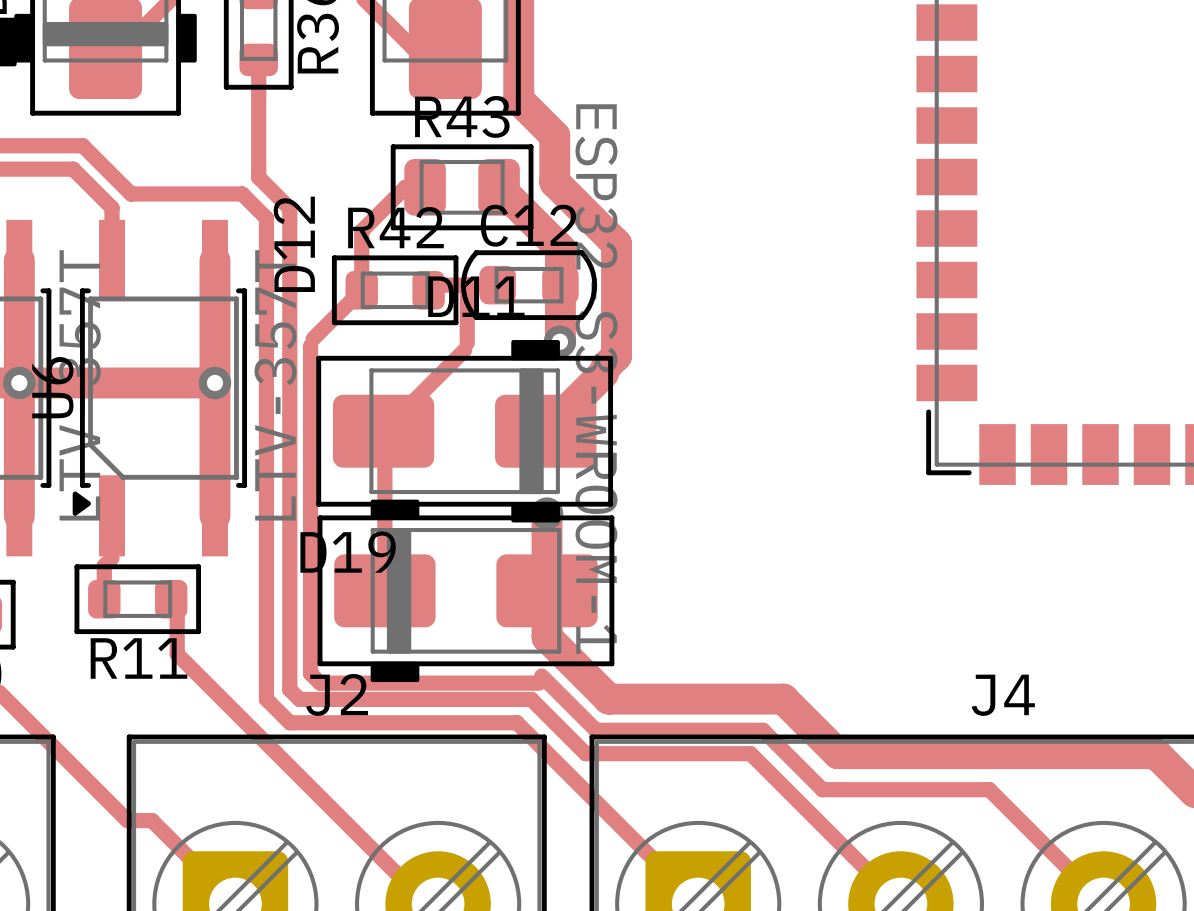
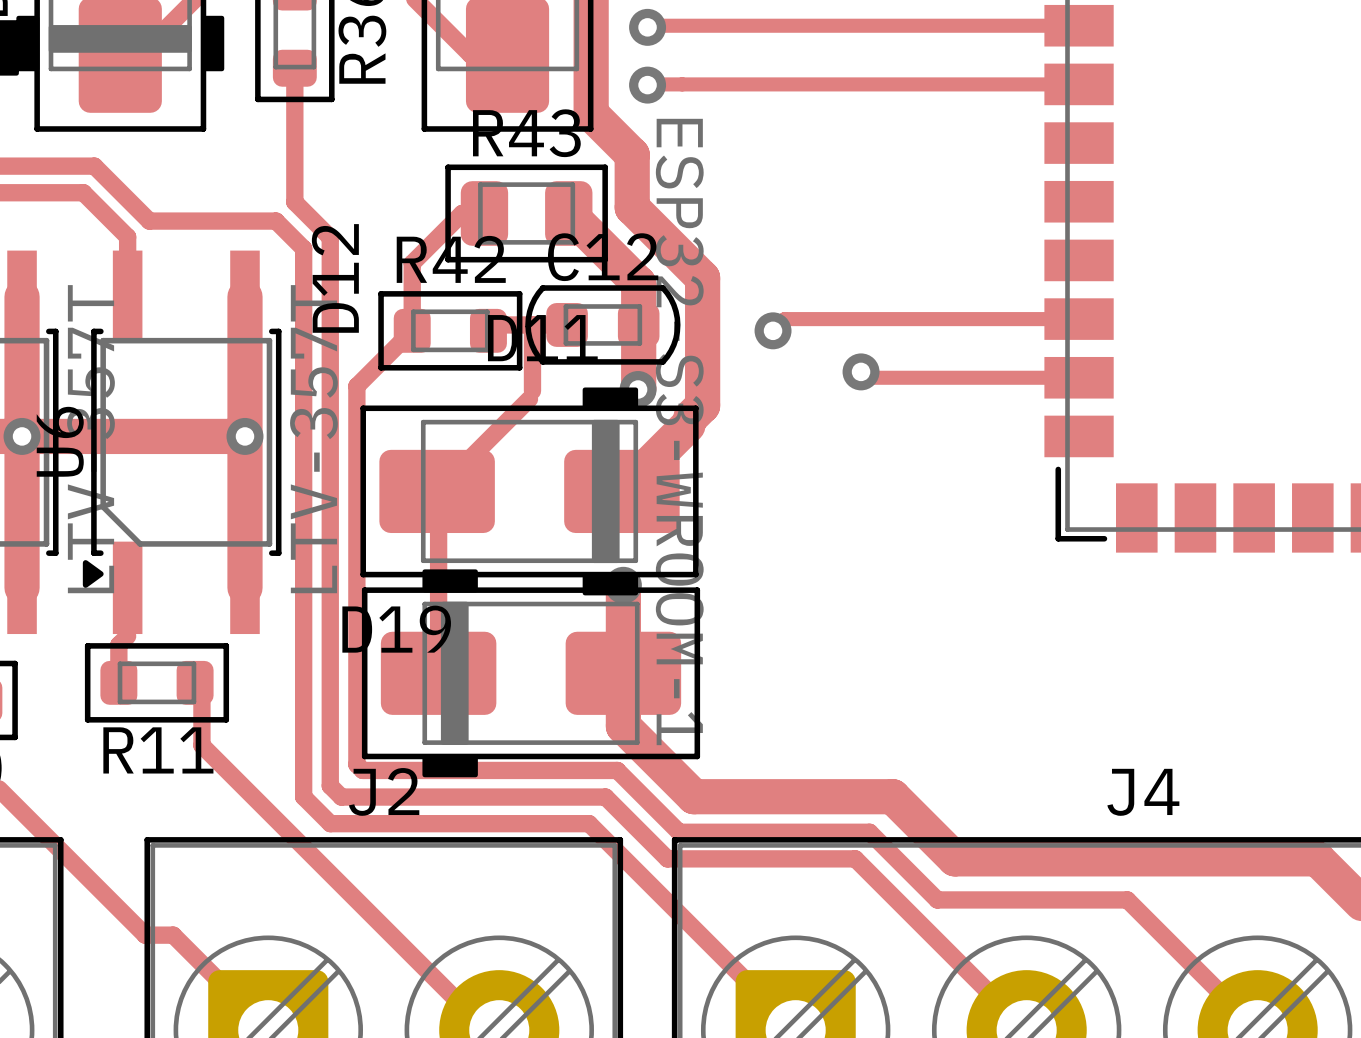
track: none -> (1079, 25) (649, 25) (647, 27)
via: none -> (647, 27)
via: none -> (647, 85)
track: none -> (1079, 84) (647, 85)
track: none -> (1079, 319) (784, 319) (773, 330)
via: none -> (773, 330)
track: none -> (861, 371) (866, 377) (1079, 377)
via: none -> (861, 371)
track: none -> (356, 386) (356, 764) (362, 770) (617, 770)
track: (310, 345) (310, 673) (320, 683) (539, 683) -> none

